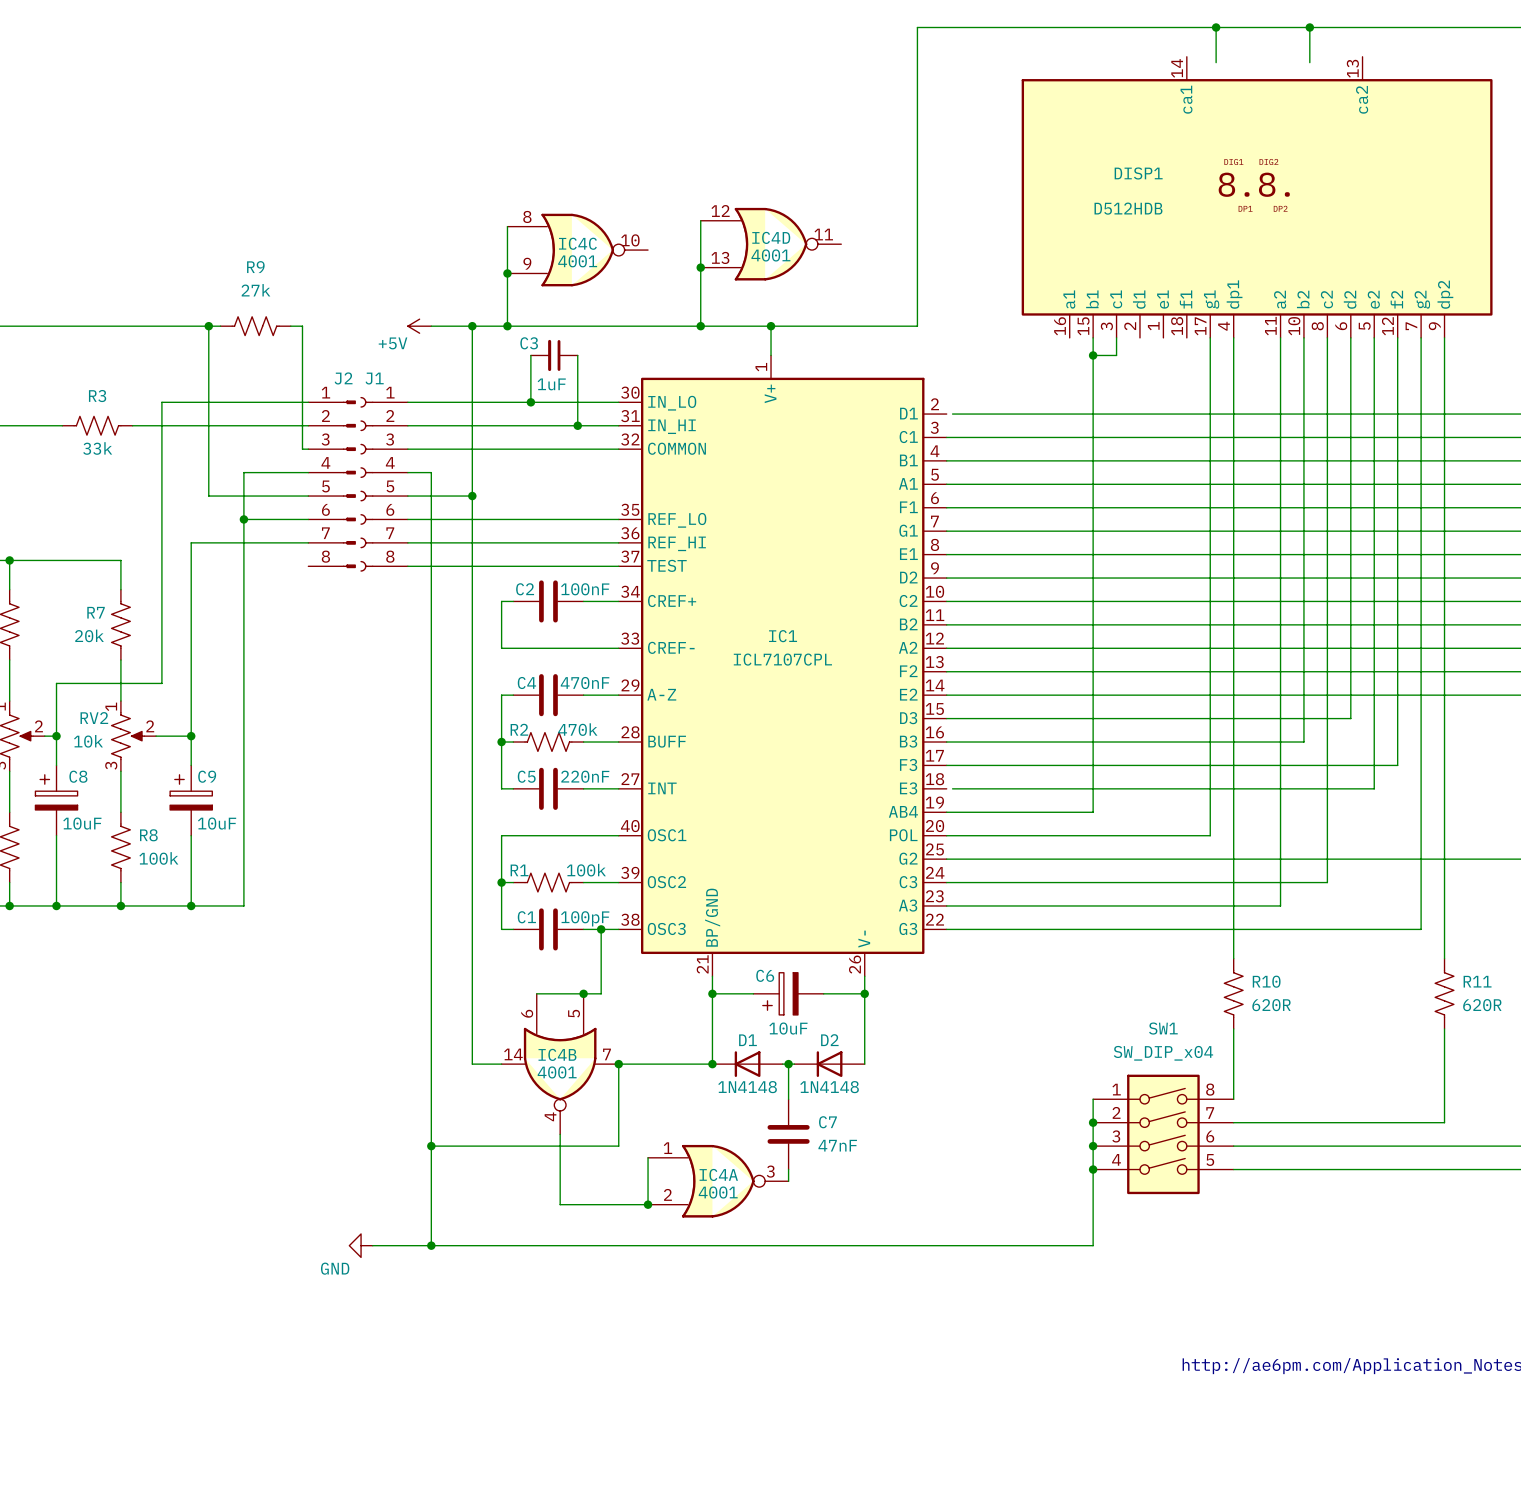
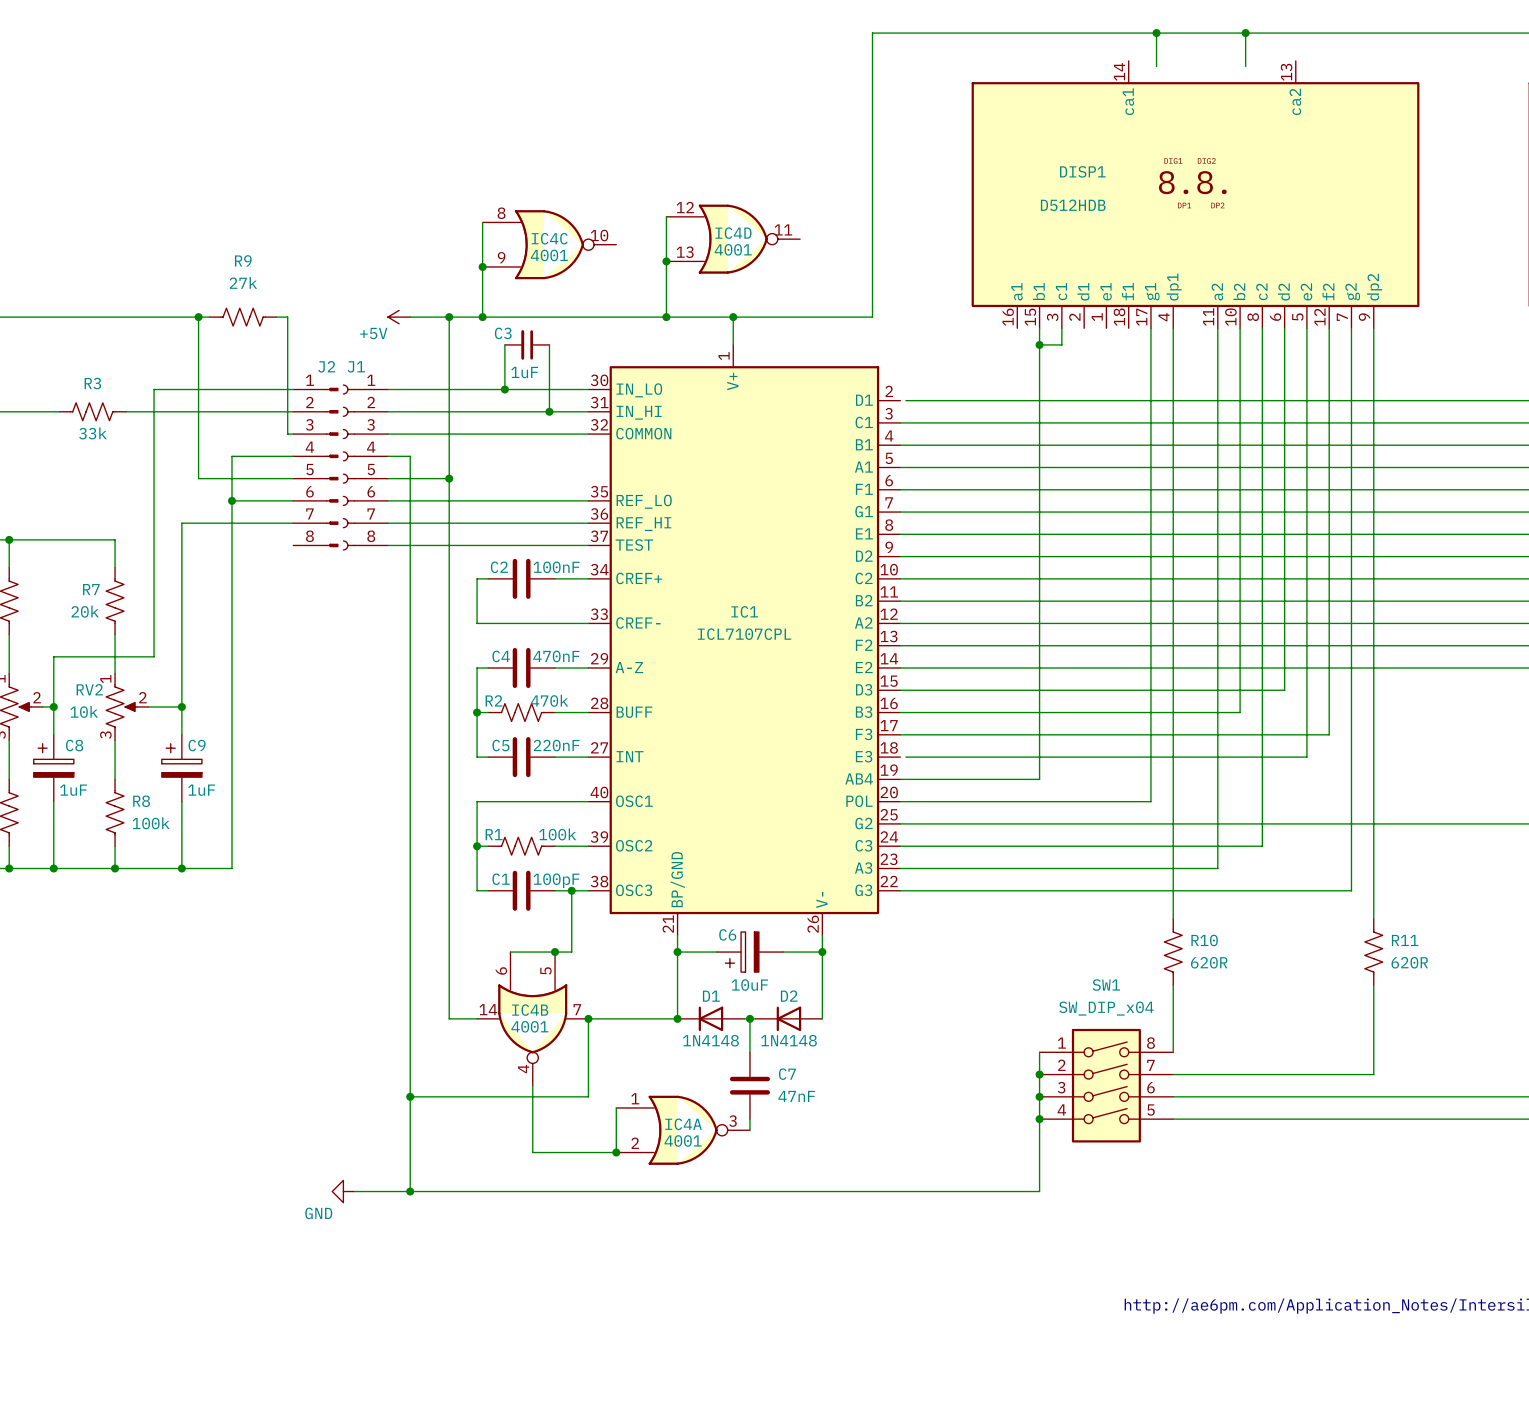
C8 value: 10uF (82, 823) -> 1uF (73, 790)
C9 value: 10uF (217, 823) -> 1uF (201, 790)

